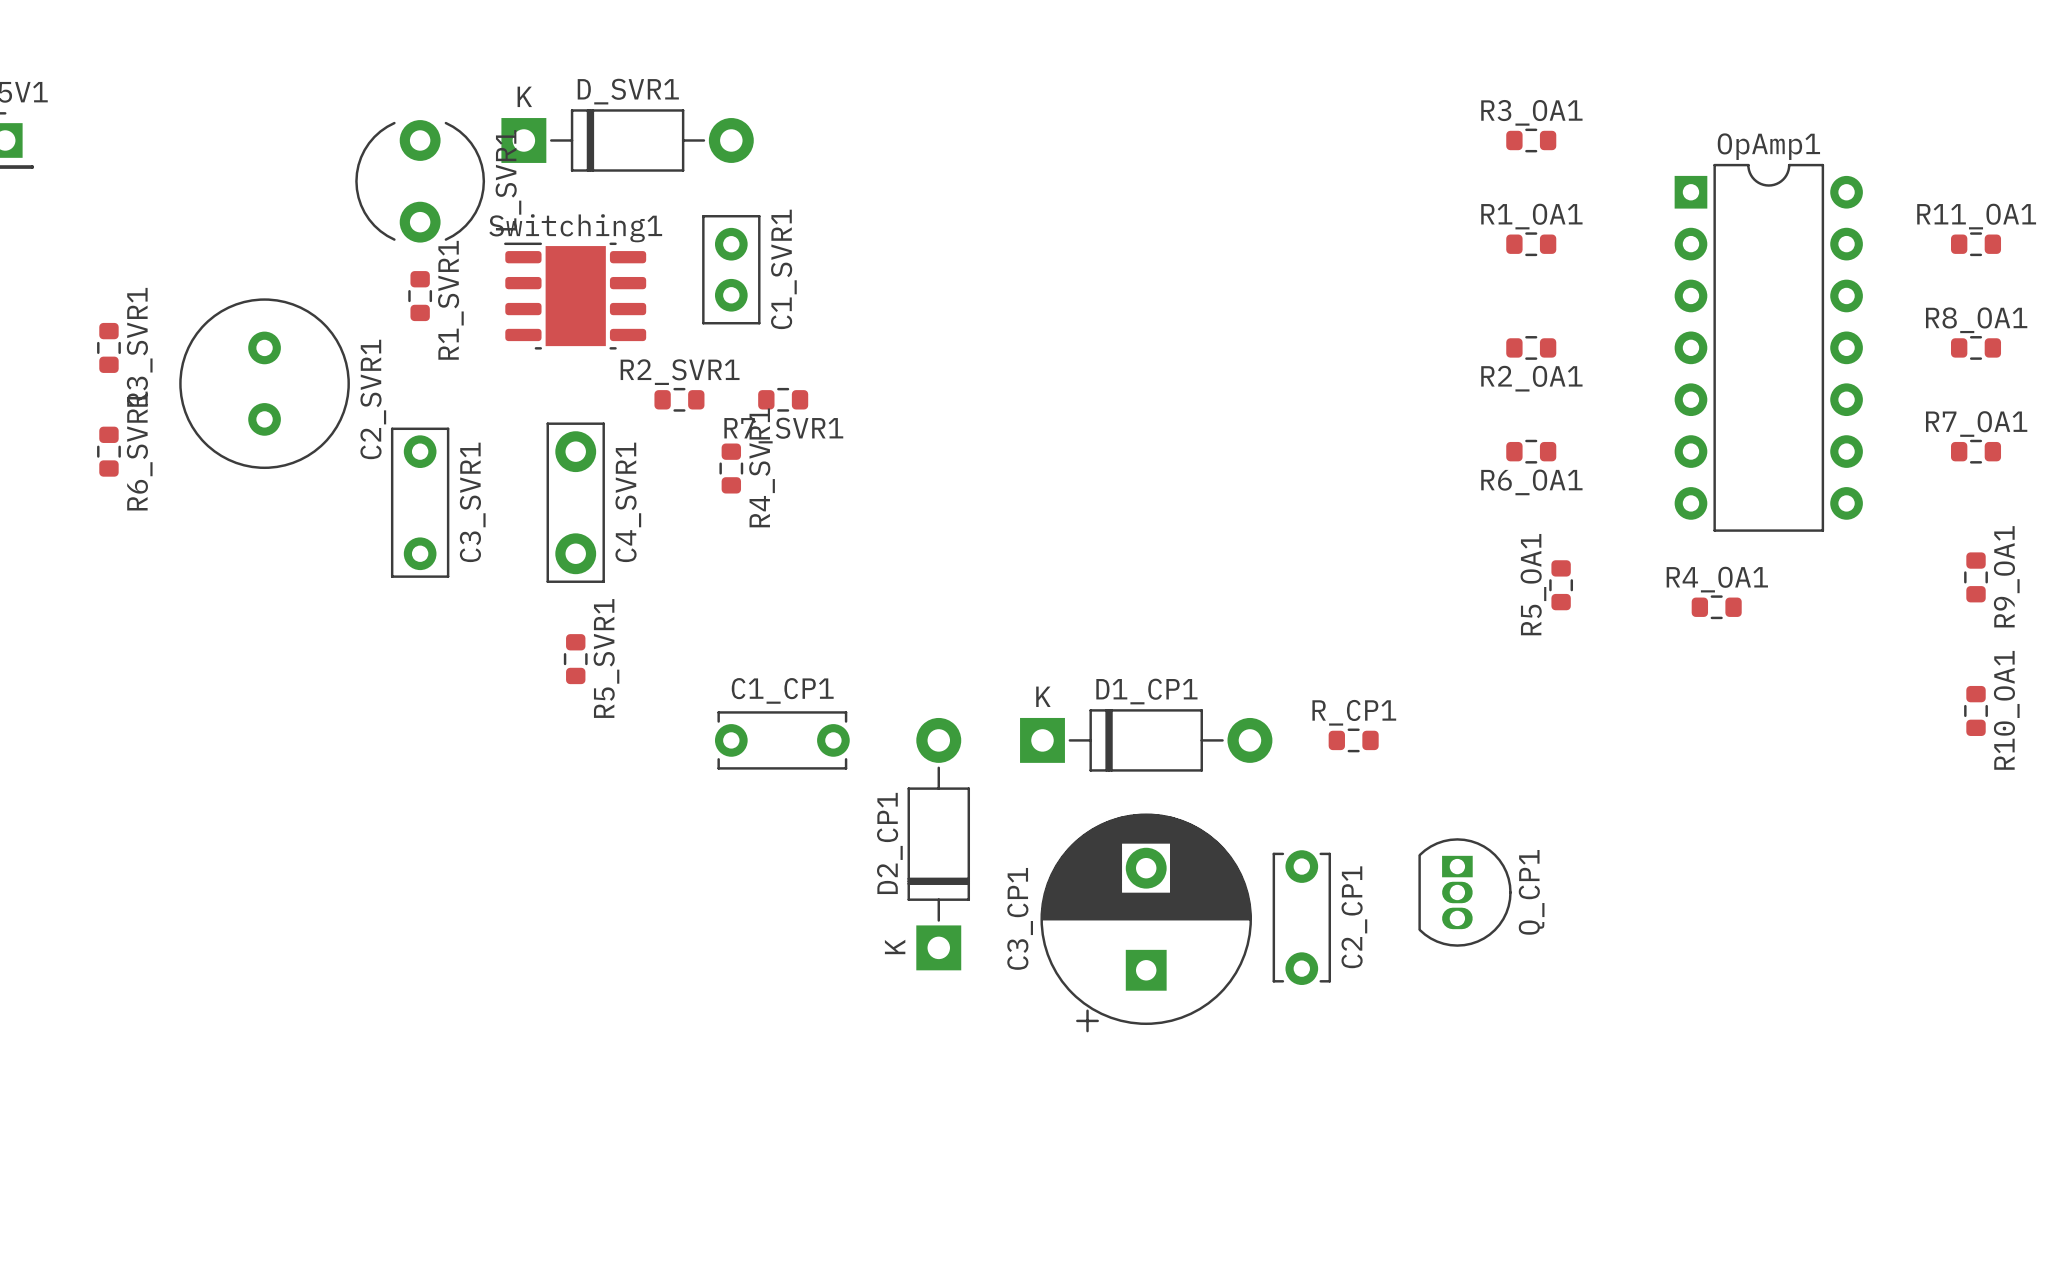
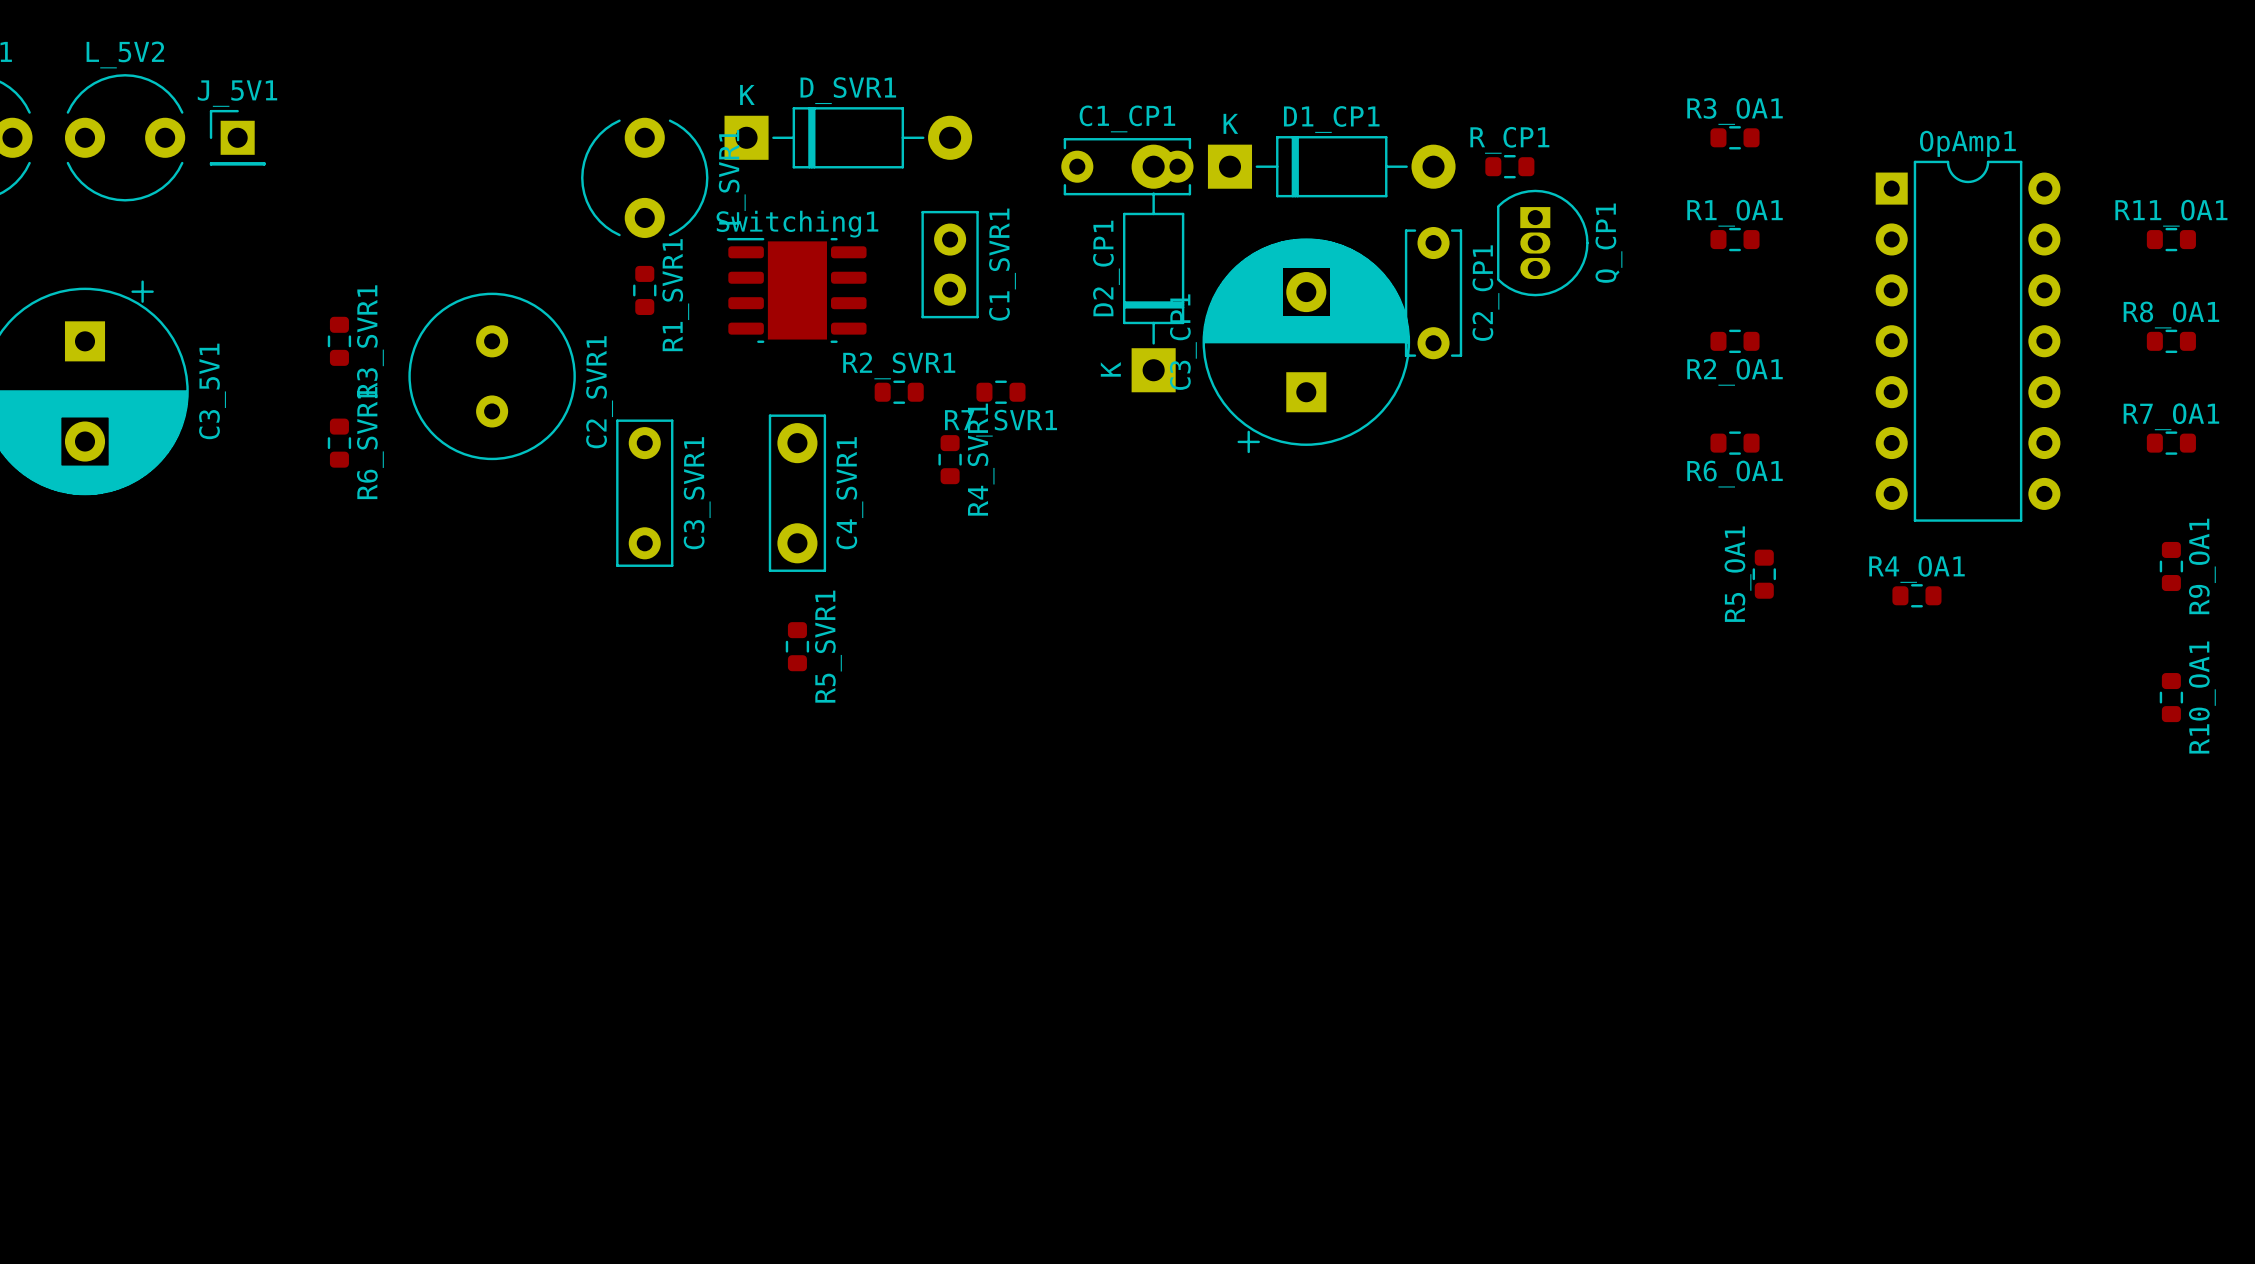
C1_CP1 position: (782, 740) -> (1127, 166)
D1_CP1 position: (1146, 740) -> (1331, 166)
R_CP1 position: (1353, 740) -> (1509, 166)
D2_CP1 position: (938, 844) -> (1153, 268)
Q_CP1 position: (1465, 892) -> (1542, 243)
C2_CP1 position: (1301, 917) -> (1433, 293)
C3_CP1 position: (1146, 922) -> (1306, 345)

